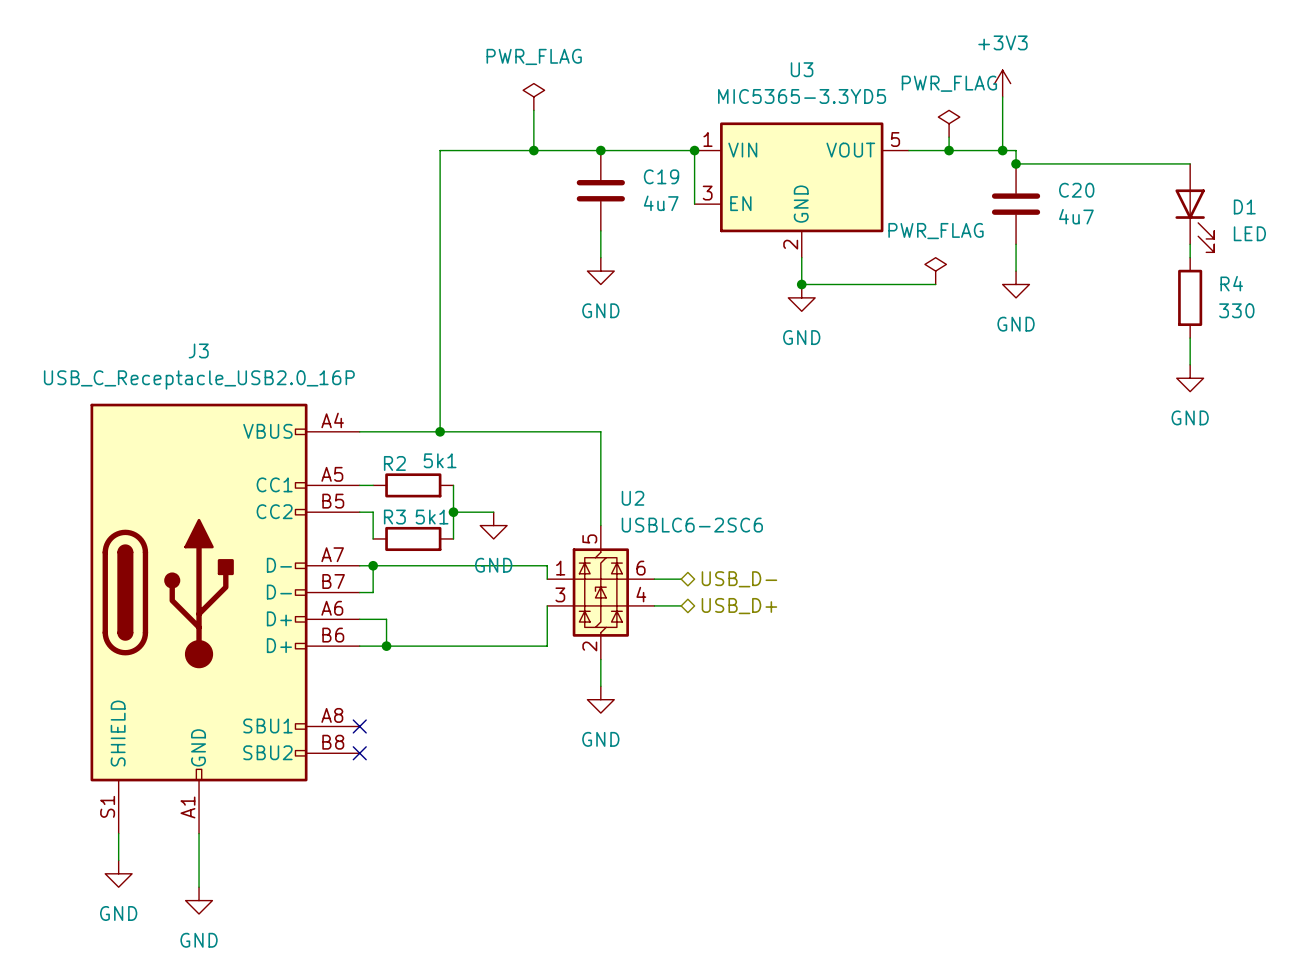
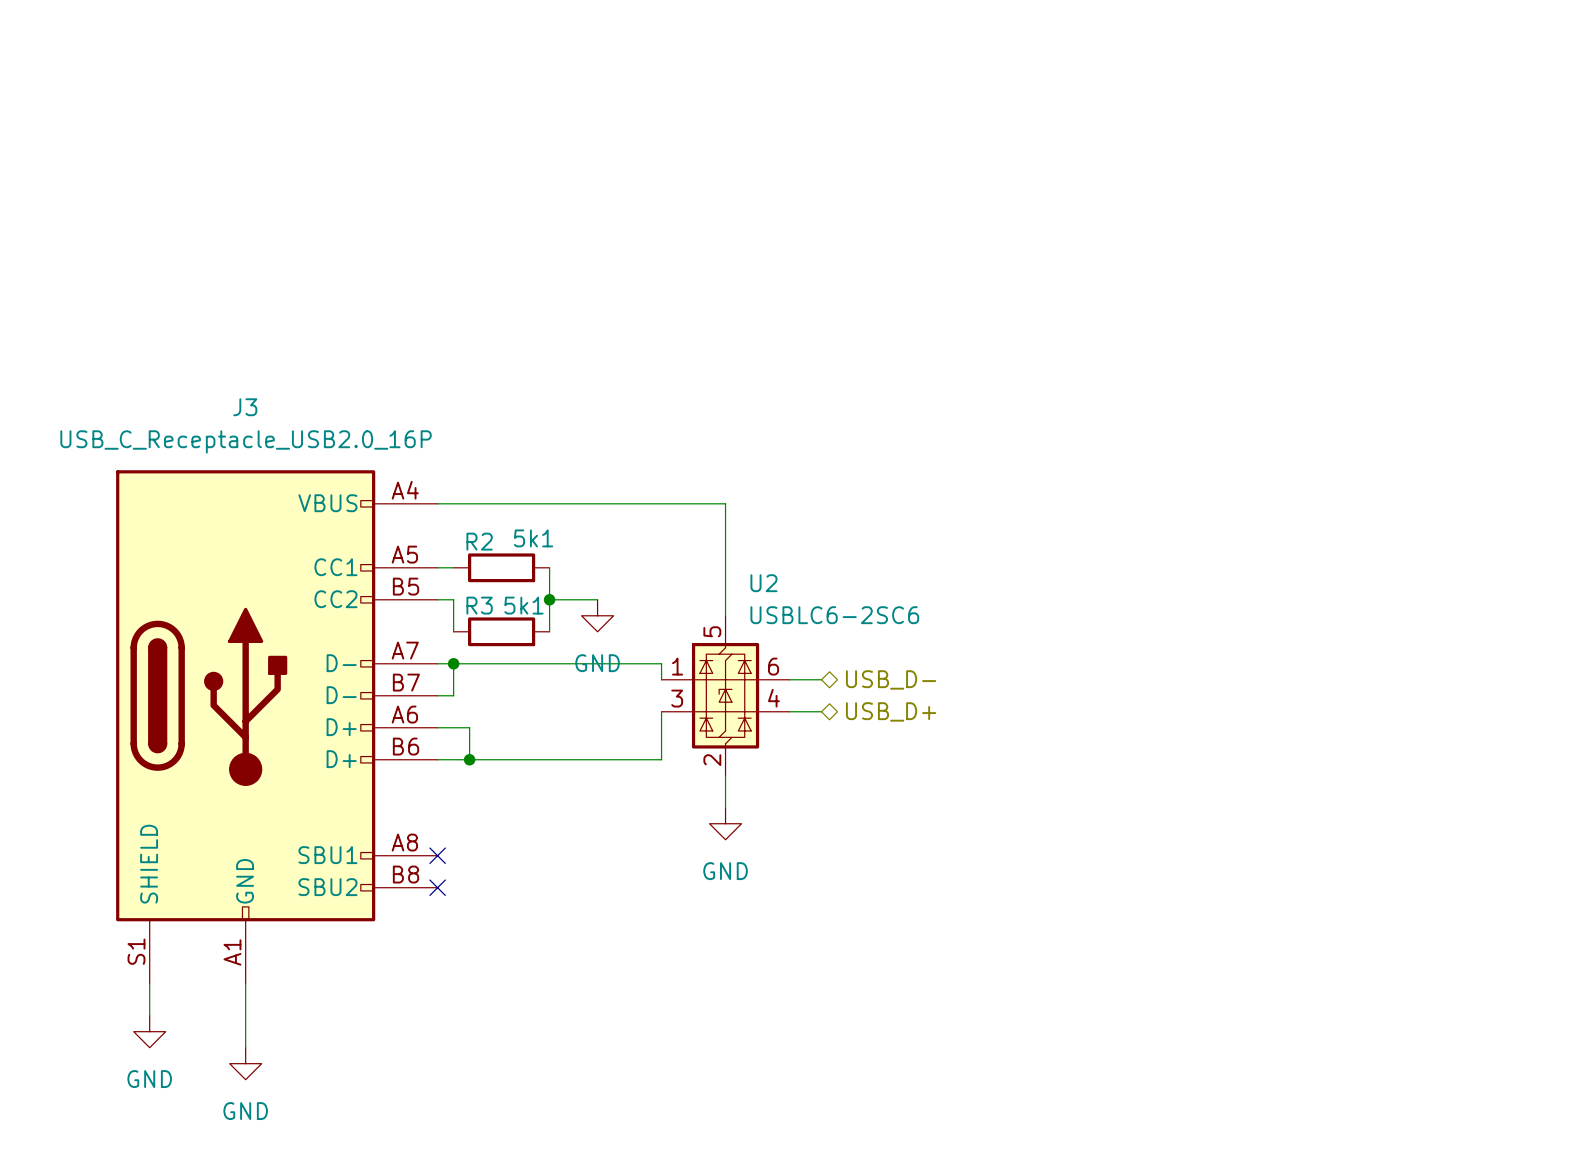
power symbol: +3V3 (1002, 83) -> none
power symbol: PWR_FLAG (533, 96) -> none
wire: (1002, 96) (1002, 150) -> none
wire: (533, 110) (533, 150) -> none
power symbol: PWR_FLAG (949, 123) -> none
wire: (949, 137) (949, 150) -> none
junction: (533, 150) -> none
junction: (600, 150) -> none
junction: (694, 150) -> none
wire: (908, 150) (1016, 150) (1016, 163) (1190, 163) -> none
junction: (949, 150) -> none
junction: (1002, 150) -> none
junction: (1016, 163) -> none
C19: 4u7 (600, 190) -> none
U3: MIC5365-3.3YD5 (801, 190) -> none
wire: (694, 204) (694, 150) (440, 150) (440, 431) -> none
C20: 4u7 (1016, 204) -> none
D1: LED (1194, 208) -> none
wire: (600, 230) (600, 257) -> none
wire: (1016, 244) (1016, 271) -> none
wire: (1190, 244) (1190, 257) -> none
wire: (801, 257) (801, 284) (935, 284) -> none
power symbol: GND (600, 271) -> none
power symbol: PWR_FLAG (935, 271) -> none
junction: (801, 284) -> none
power symbol: GND (1016, 284) -> none
power symbol: GND (801, 297) -> none
R4: 330 (1190, 297) -> none
wire: (1190, 338) (1190, 364) -> none
power symbol: GND (1190, 378) -> none
junction: (440, 431) -> none

